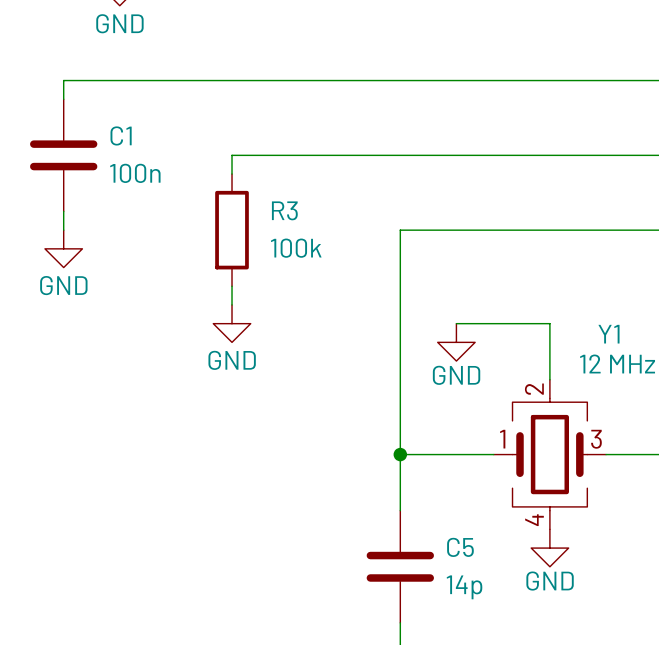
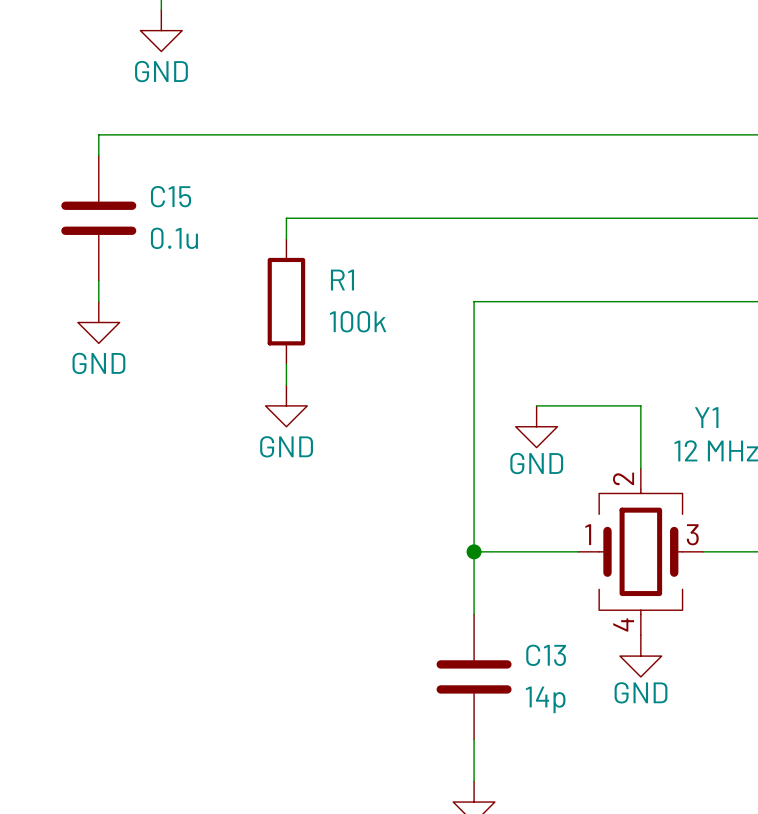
C1 name: C1 (121, 135) -> C15 (171, 196)
C1 value: 100n (135, 173) -> 0.1u (174, 238)
R3 name: R3 (284, 210) -> R1 (342, 280)
C5 name: C5 (460, 547) -> C13 (546, 655)

